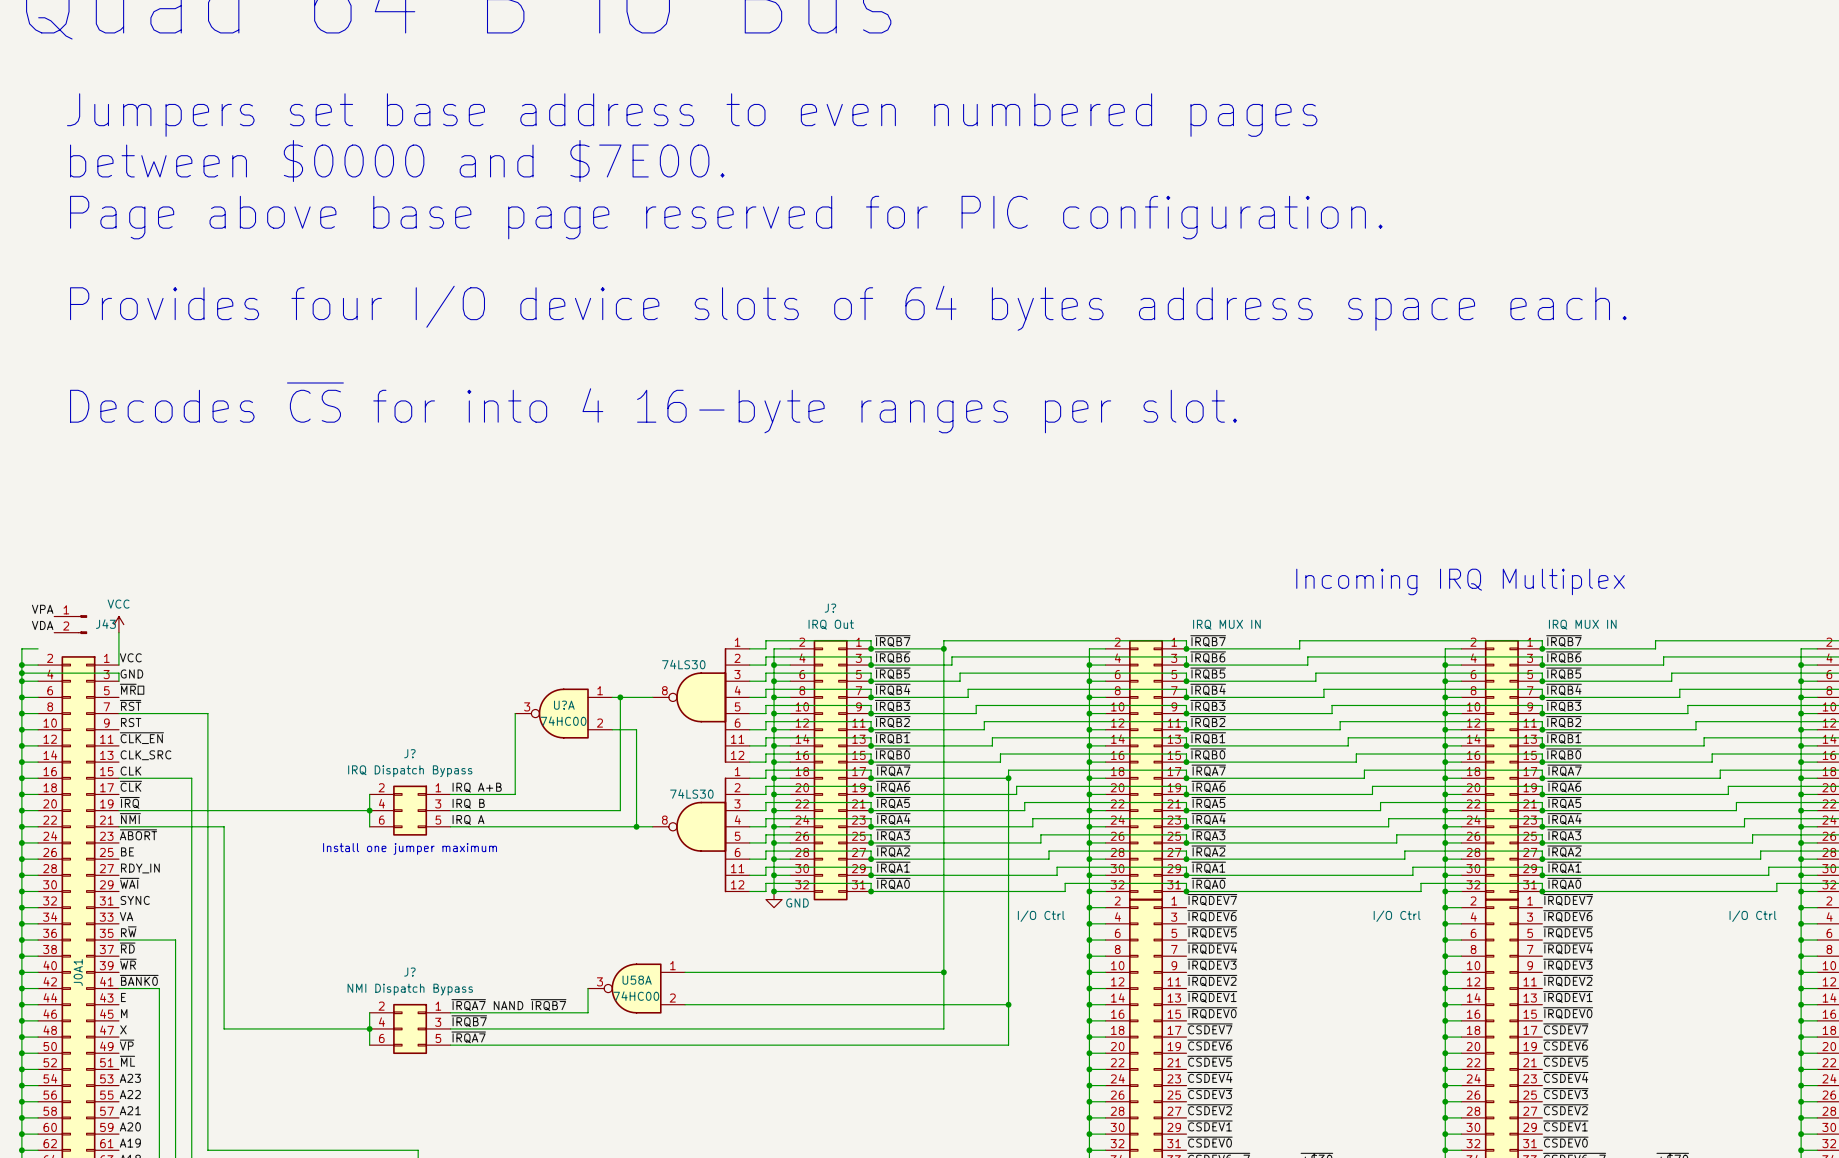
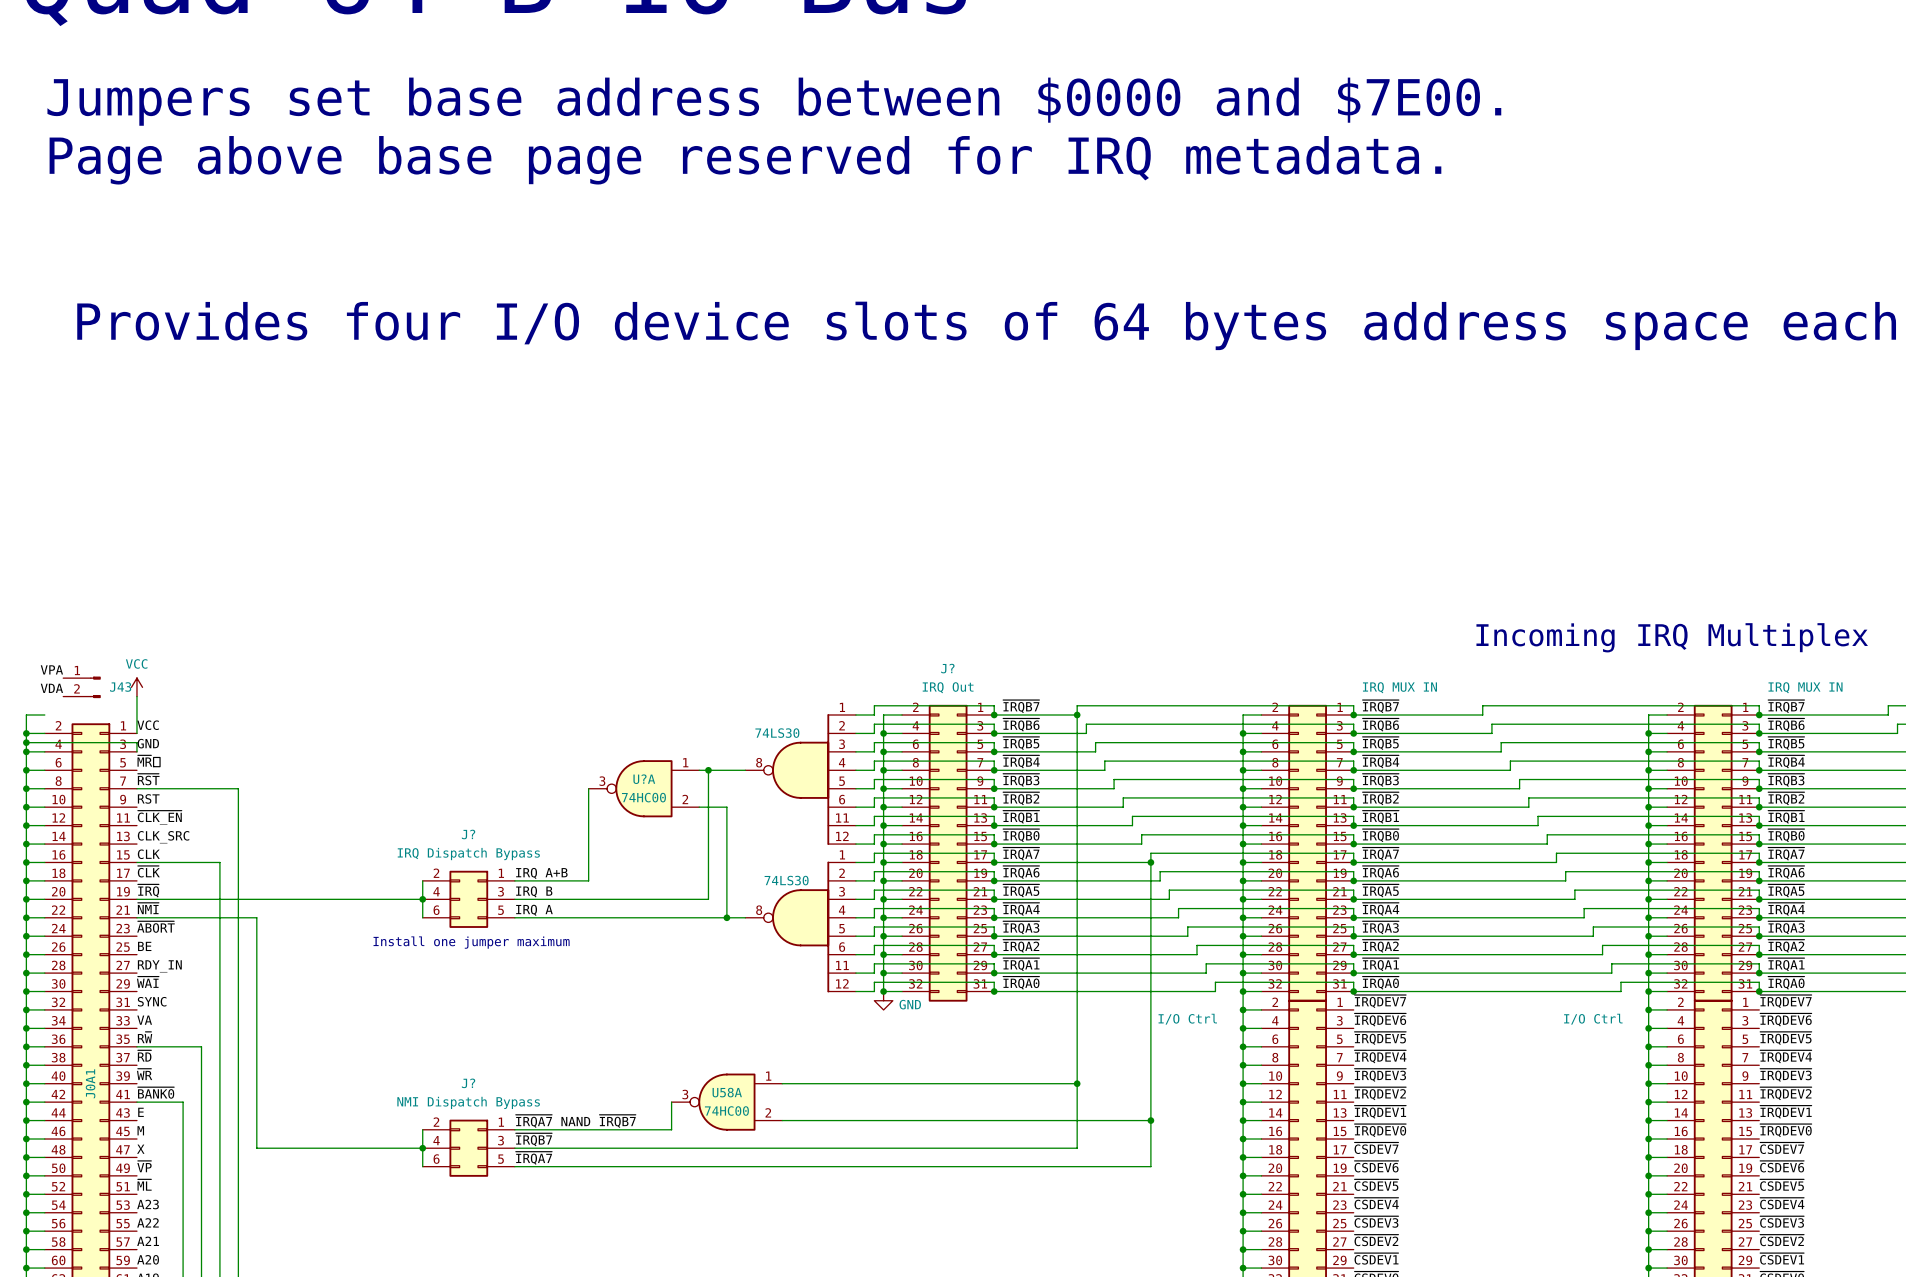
text: Jumpers set base address to even numbered pages (692, 115) -> Jumpers set base address between $0000 and $7E00. (774, 101)
text: between $0000 and $7E00. (397, 161) -> none
text: Page above base page reserved for PIC configuration. (726, 217) -> Page above base page reserved for IRQ metadata. (745, 160)
text: Decodes ~{CS} for into 4 16-byte ranges per slot. (653, 407) -> none

